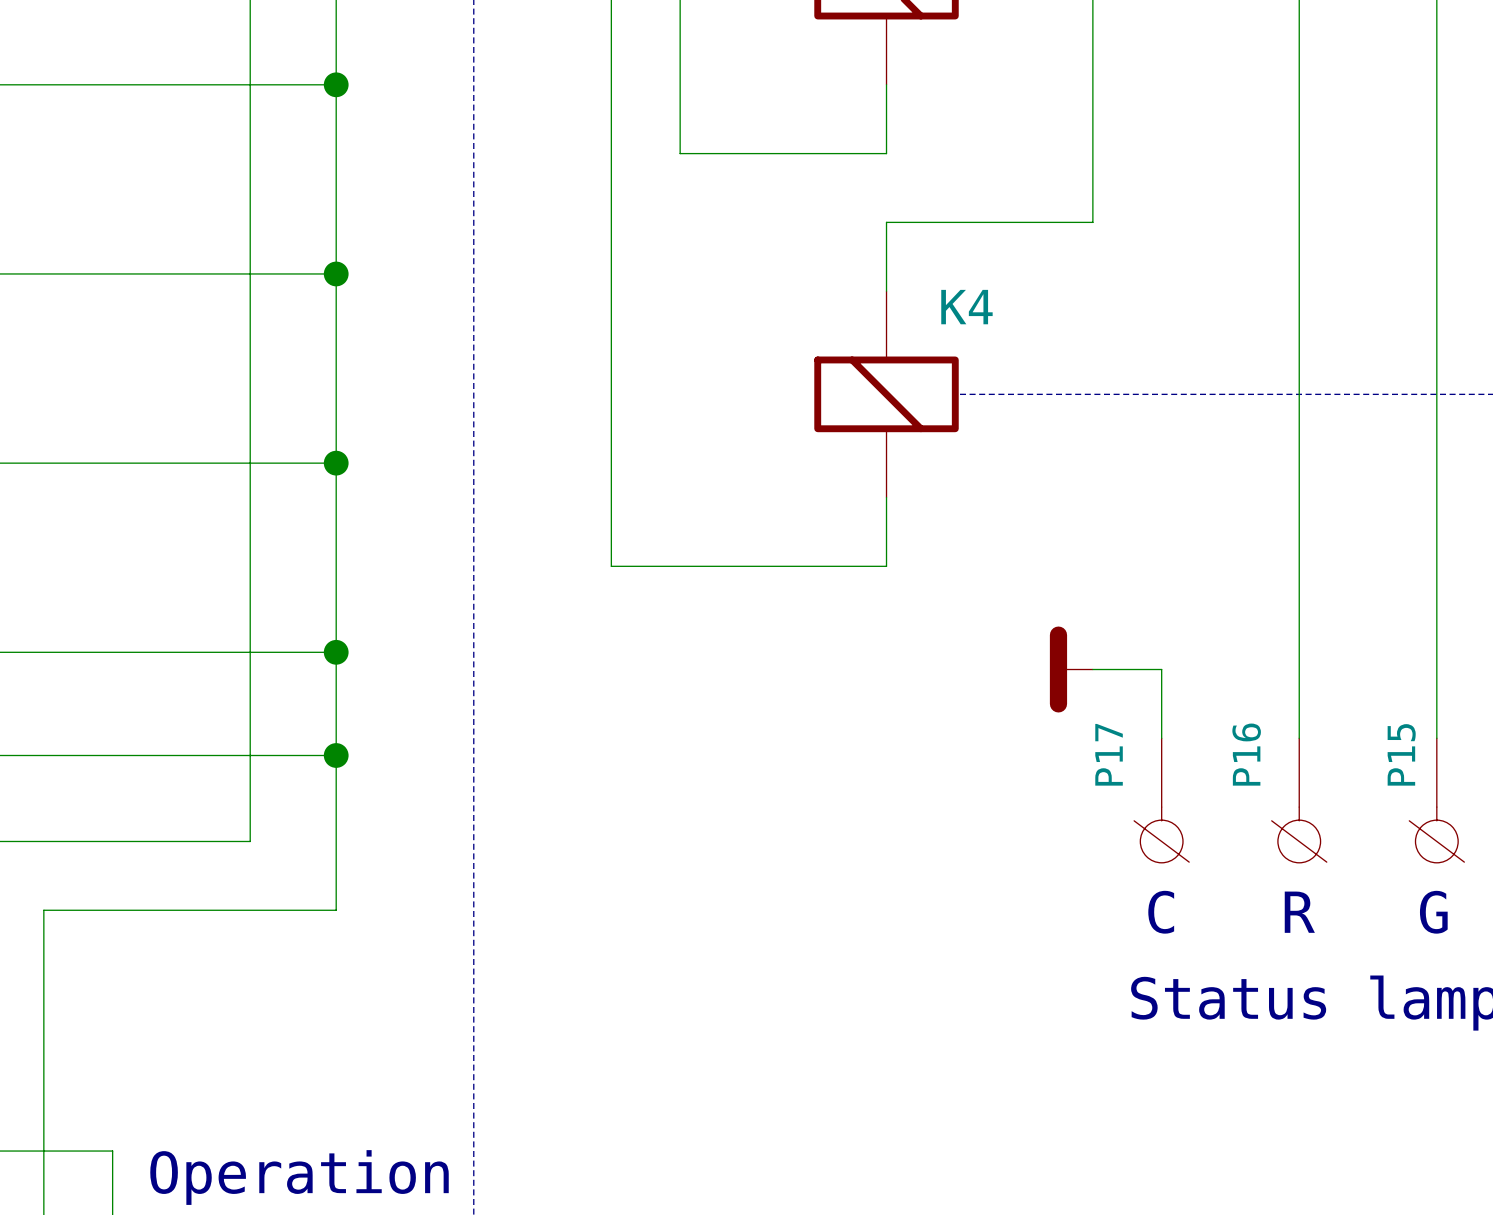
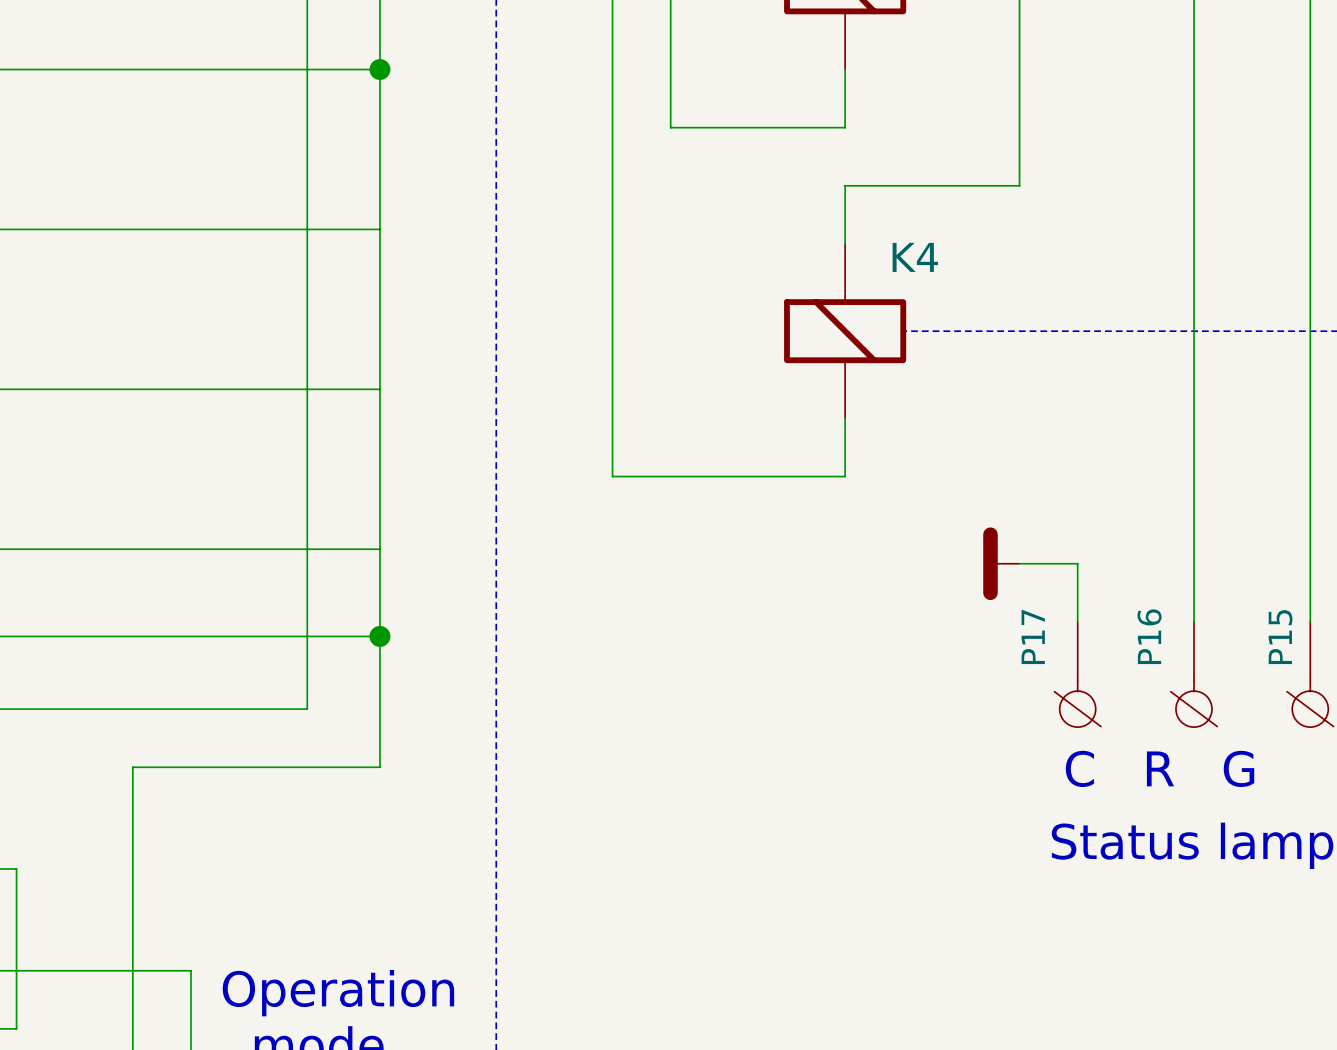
junction: (336, 273) -> none
junction: (336, 463) -> none
junction: (336, 652) -> none

